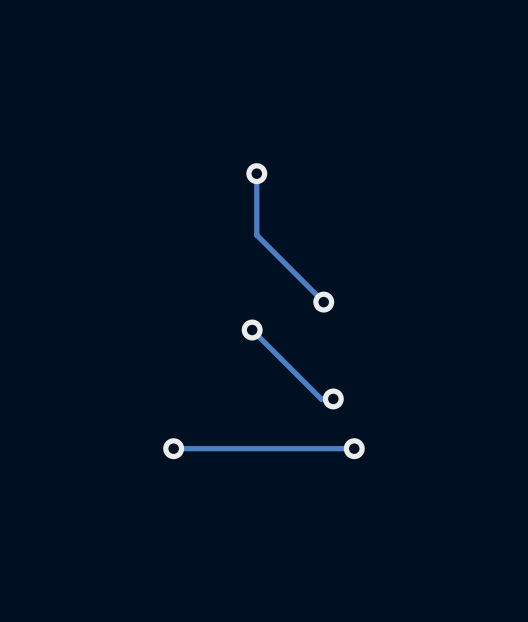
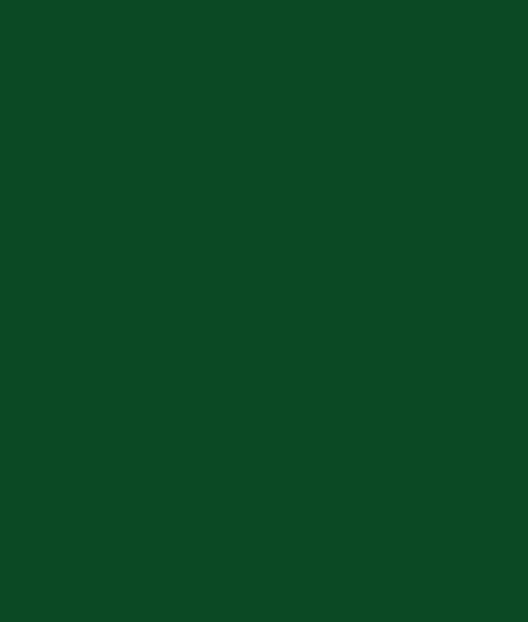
track: (256, 173) (256, 235) (323, 302) -> none
via: (256, 173) -> none
via: (323, 302) -> none
track: (252, 330) (321, 398) (333, 398) -> none
via: (252, 330) -> none
via: (333, 398) -> none
via: (173, 448) -> none
track: (354, 448) (173, 448) -> none
via: (354, 448) -> none

